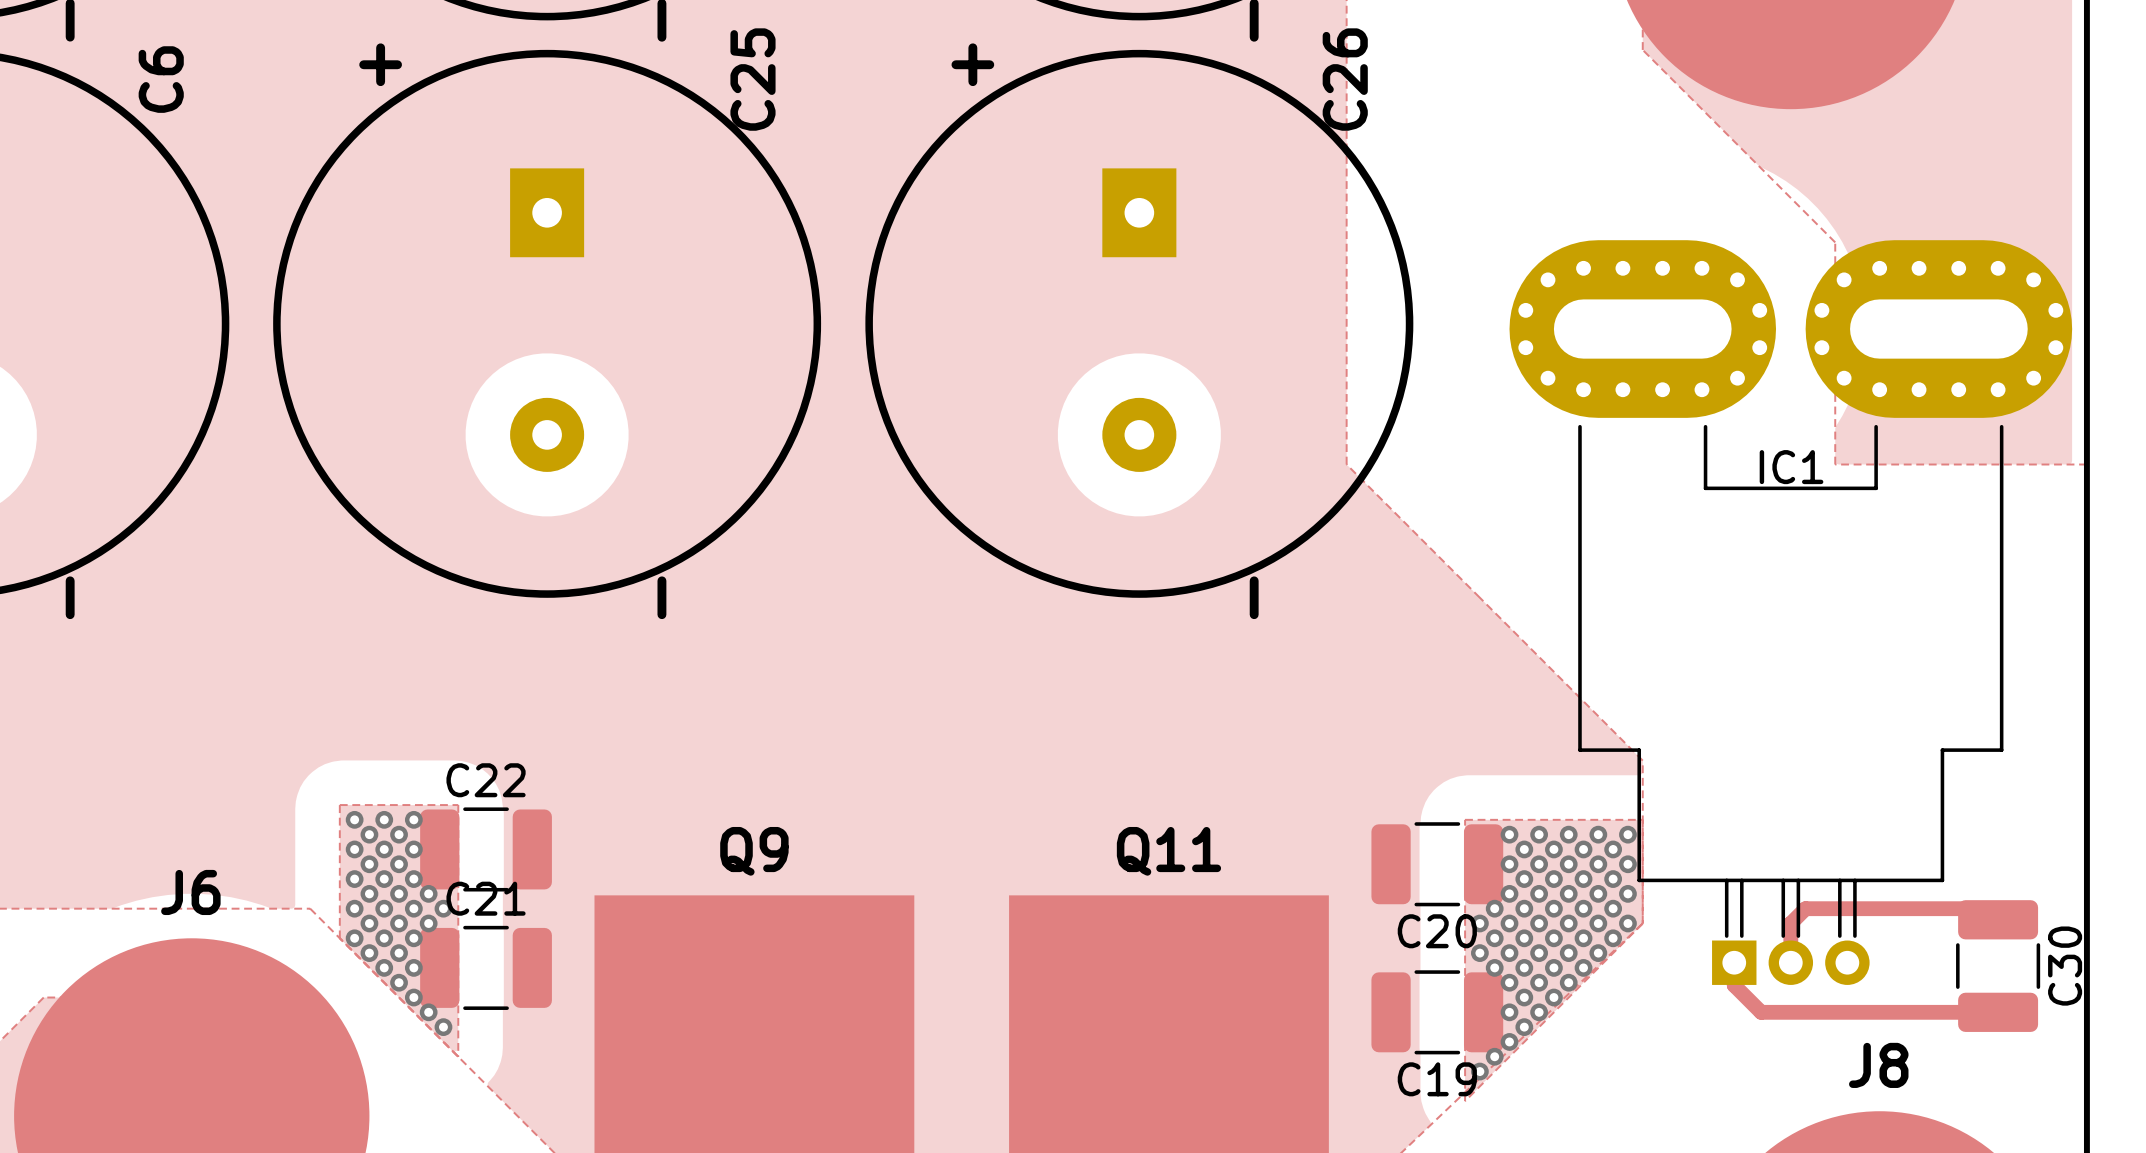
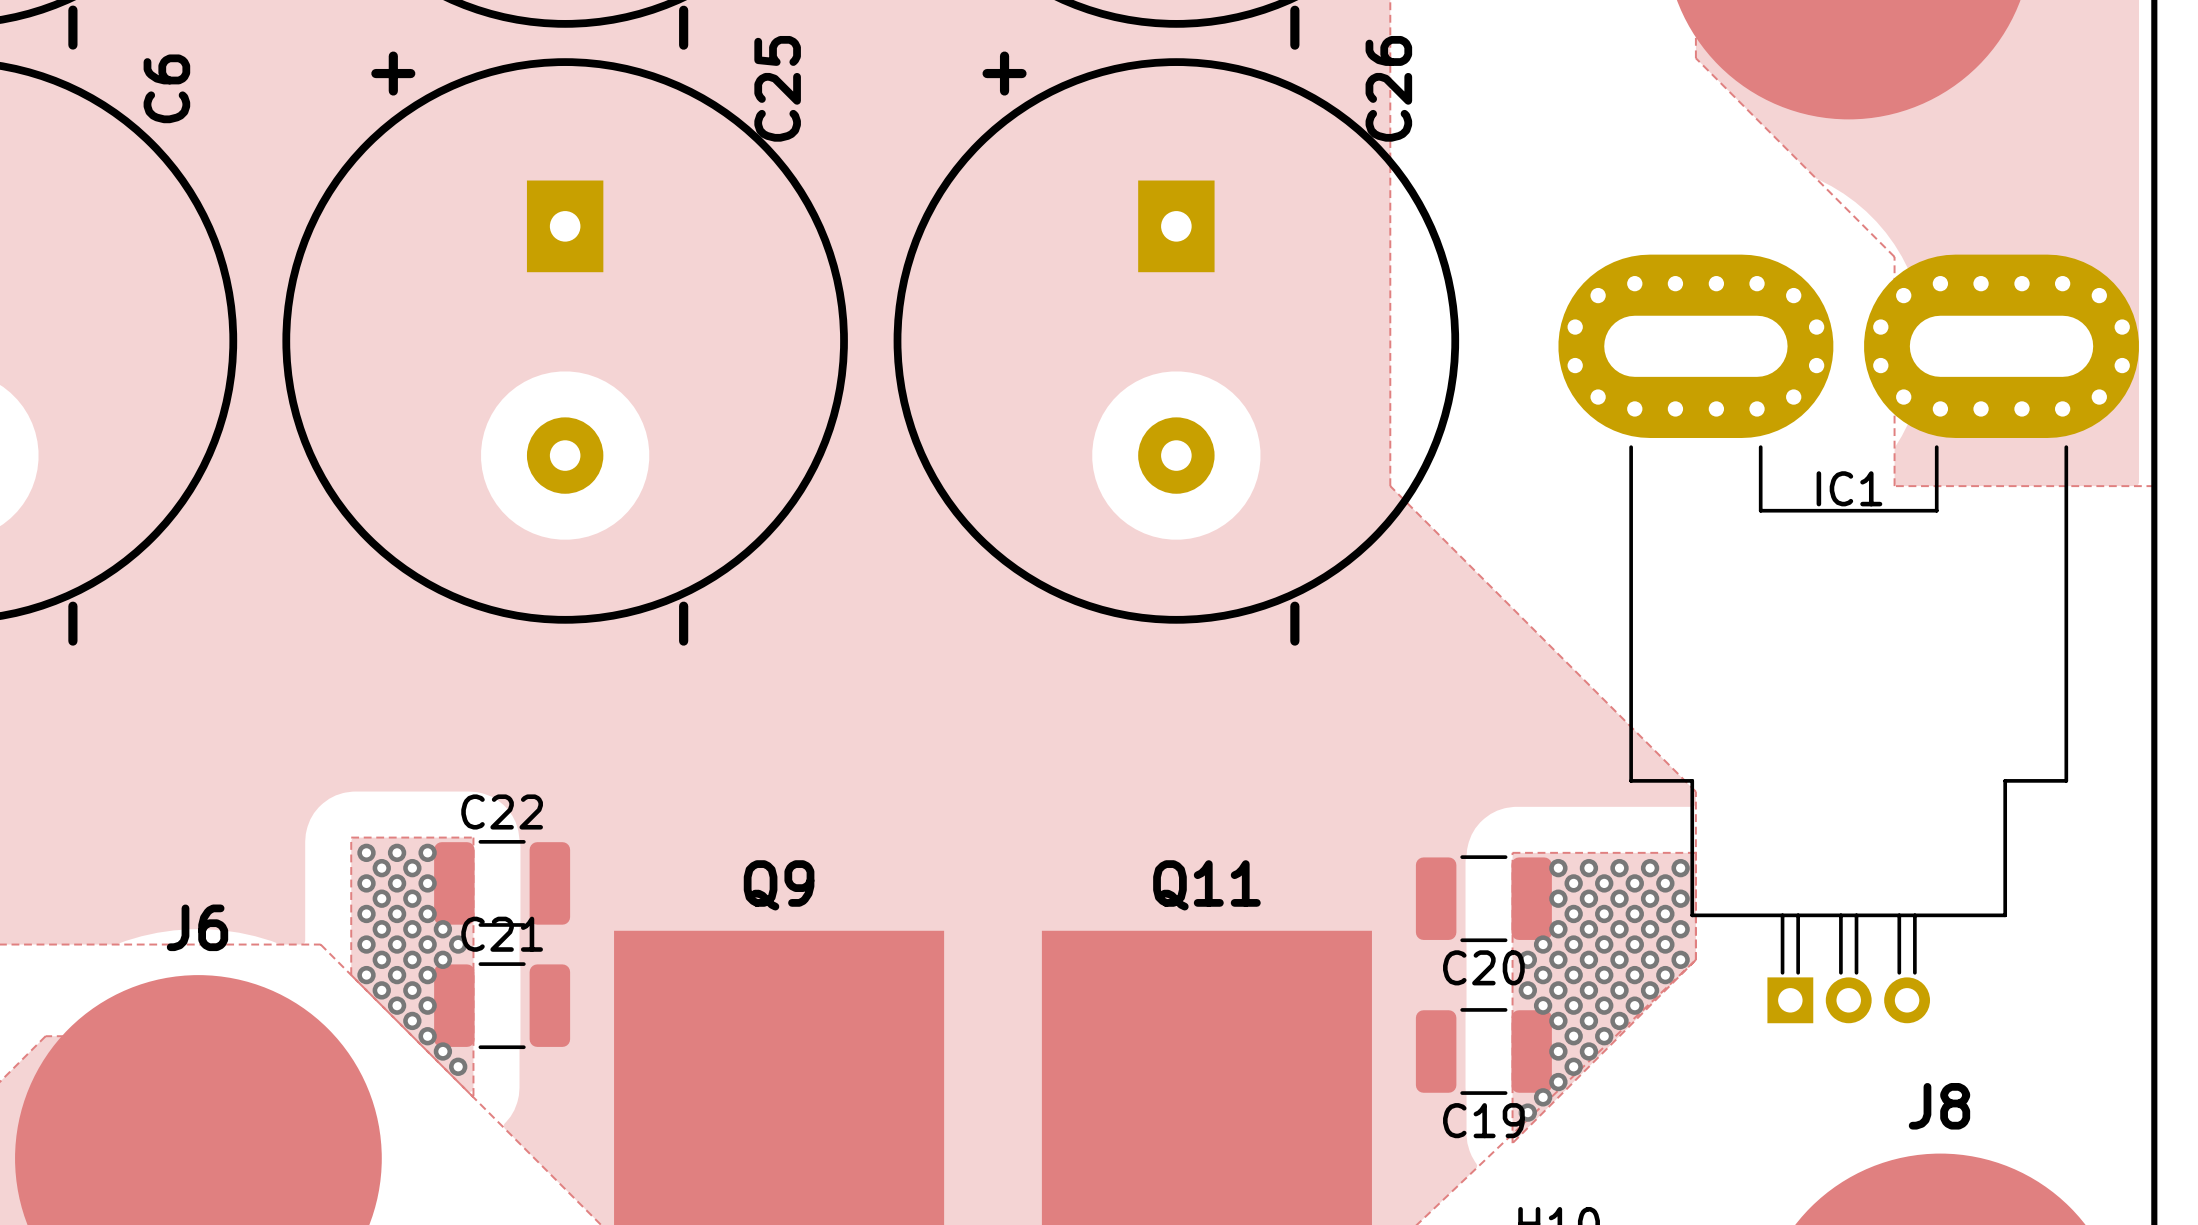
track: (1998, 919) (1987, 908) (1805, 908) (1790, 923) (1790, 962) -> none
track: (1734, 962) (1734, 985) (1761, 1012) (1998, 1012) -> none
C30: (1998, 966) -> none

